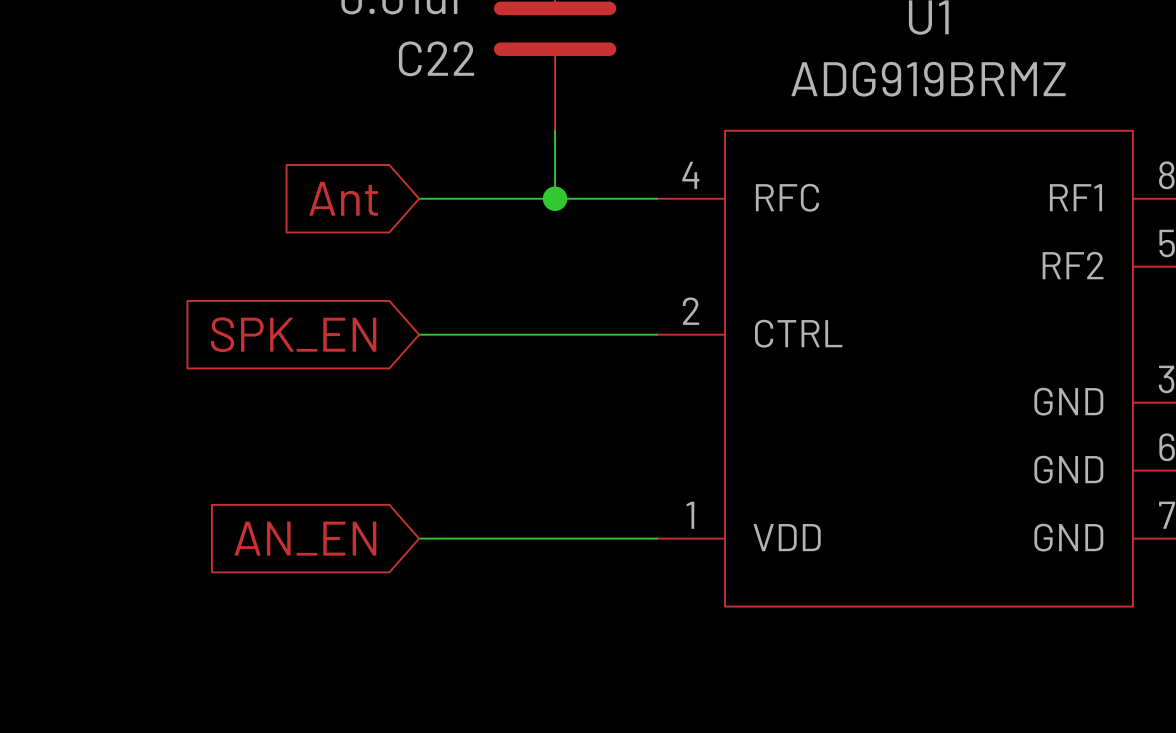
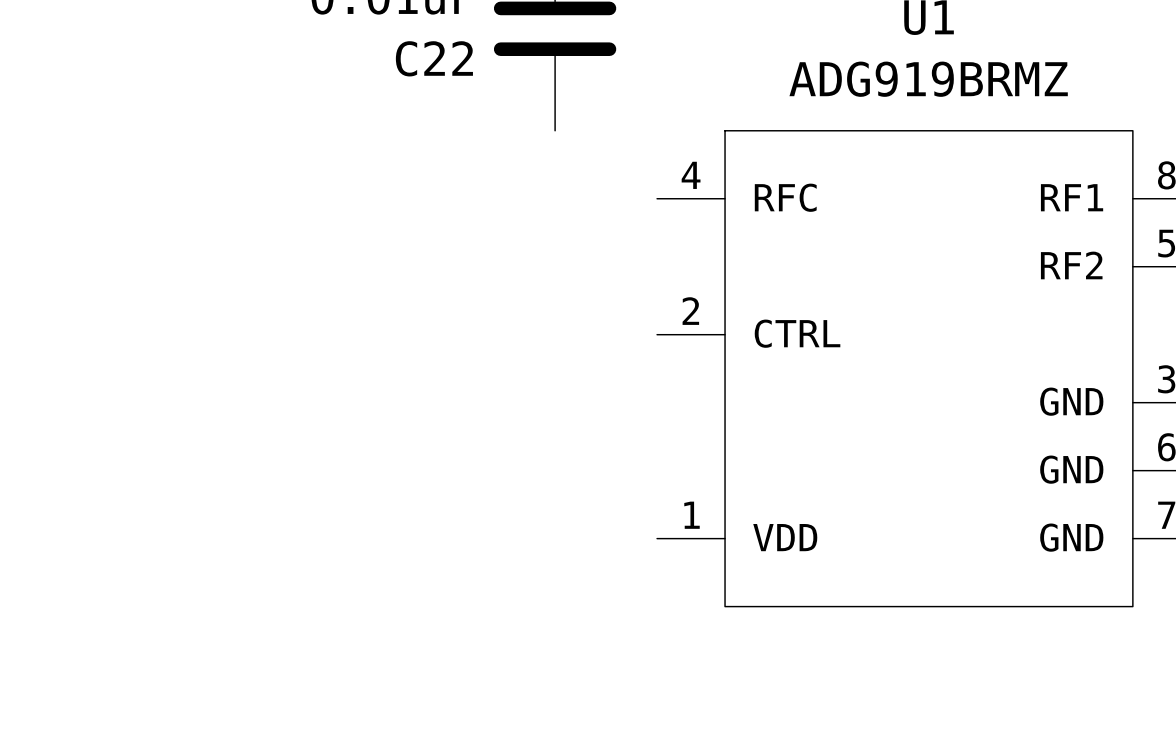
wire: (555, 130) (555, 198) -> none
global label: Ant (343, 198) -> none
wire: (419, 198) (657, 198) -> none
junction: (555, 198) -> none
global label: SPK_EN (293, 334) -> none
wire: (419, 334) (657, 334) -> none
global label: AN_EN (305, 538) -> none
wire: (419, 538) (657, 538) -> none

